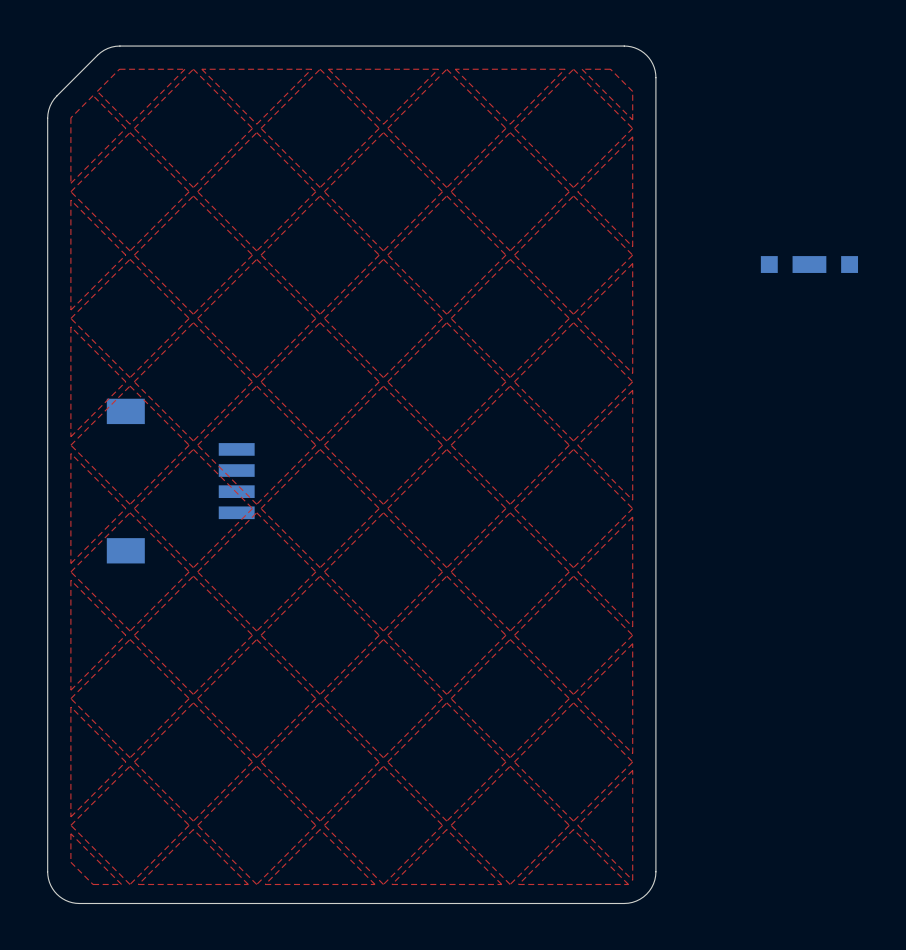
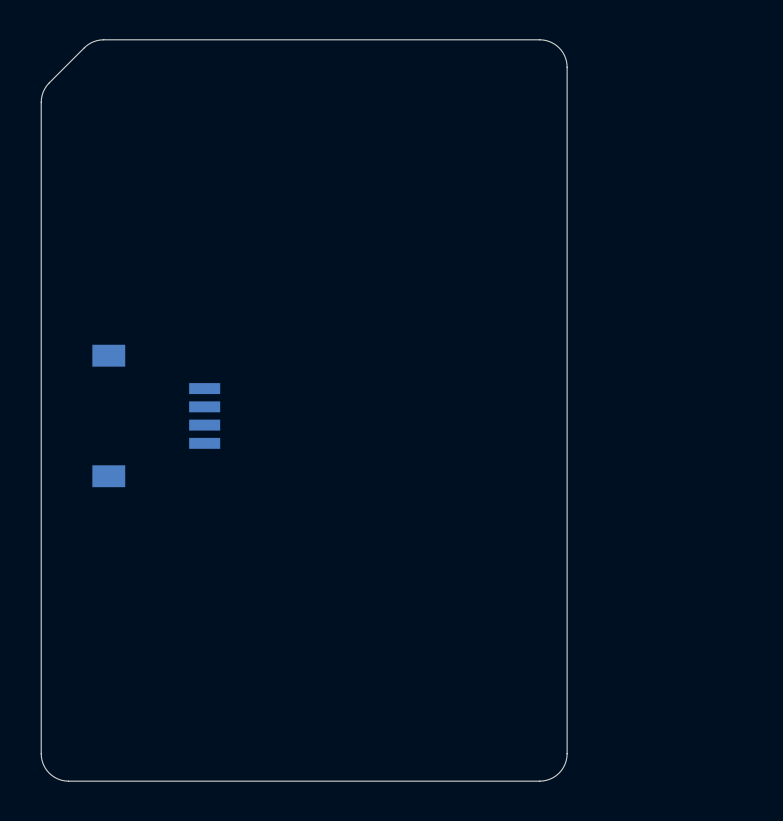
top zone outline: (119, 69) (184, 69) (130, 124) (97, 91) (119, 69) -> none
top zone outline: (193, 69) (252, 128) (193, 187) (134, 128) (193, 69) -> none
top zone outline: (201, 69) (256, 124) (311, 69) (201, 69) -> none
top zone outline: (320, 69) (260, 128) (320, 187) (379, 128) (320, 69) -> none
top zone outline: (328, 69) (383, 124) (438, 69) (328, 69) -> none
top zone outline: (446, 69) (387, 128) (446, 187) (505, 128) (446, 69) -> none
top zone outline: (455, 69) (510, 124) (565, 69) (455, 69) -> none
top zone outline: (573, 69) (514, 128) (573, 187) (632, 128) (573, 69) -> none
top zone outline: (582, 69) (610, 69) (632, 91) (632, 119) (582, 69) -> none
top zone outline: (93, 95) (125, 128) (70, 183) (70, 117) (93, 95) -> none
top zone outline: (130, 132) (70, 191) (130, 250) (189, 191) (130, 132) -> none
top zone outline: (256, 132) (315, 191) (256, 250) (197, 191) (256, 132) -> none
top zone outline: (383, 132) (324, 191) (383, 250) (442, 191) (383, 132) -> none
top zone outline: (510, 132) (451, 191) (510, 250) (569, 191) (510, 132) -> none
top zone outline: (632, 136) (577, 191) (632, 246) (632, 136) -> none
top zone outline: (193, 195) (134, 255) (193, 314) (252, 255) (193, 195) -> none
top zone outline: (320, 195) (379, 255) (320, 314) (260, 255) (320, 195) -> none
top zone outline: (446, 195) (387, 255) (446, 314) (505, 255) (446, 195) -> none
top zone outline: (573, 195) (514, 255) (573, 314) (632, 255) (573, 195) -> none
top zone outline: (70, 200) (125, 255) (70, 310) (70, 200) -> none
top zone outline: (130, 259) (189, 318) (130, 377) (70, 318) (130, 259) -> none
top zone outline: (256, 259) (197, 318) (256, 377) (315, 318) (256, 259) -> none
top zone outline: (383, 259) (442, 318) (383, 377) (324, 318) (383, 259) -> none
top zone outline: (510, 259) (451, 318) (510, 377) (569, 318) (510, 259) -> none
top zone outline: (632, 263) (577, 318) (632, 373) (632, 263) -> none
part: (785, 264) -> none
part: (833, 264) -> none
top zone outline: (193, 322) (252, 381) (193, 440) (134, 381) (193, 322) -> none
top zone outline: (320, 322) (260, 381) (320, 440) (379, 381) (320, 322) -> none
top zone outline: (446, 322) (505, 381) (446, 440) (387, 381) (446, 322) -> none
top zone outline: (573, 322) (514, 381) (573, 440) (632, 381) (573, 322) -> none
top zone outline: (70, 326) (125, 381) (70, 436) (70, 326) -> none
top zone outline: (130, 386) (189, 445) (130, 504) (70, 445) (130, 386) -> none
top zone outline: (256, 386) (315, 445) (256, 504) (197, 445) (256, 386) -> none
top zone outline: (383, 386) (442, 445) (383, 504) (324, 445) (383, 386) -> none
top zone outline: (510, 386) (569, 445) (510, 504) (451, 445) (510, 386) -> none
top zone outline: (632, 390) (577, 445) (632, 500) (632, 390) -> none
top zone outline: (193, 449) (252, 508) (193, 567) (134, 508) (193, 449) -> none
top zone outline: (320, 449) (379, 508) (320, 567) (260, 508) (320, 449) -> none
top zone outline: (446, 449) (505, 508) (446, 567) (387, 508) (446, 449) -> none
top zone outline: (573, 449) (632, 508) (573, 567) (514, 508) (573, 449) -> none
top zone outline: (70, 453) (125, 508) (70, 563) (70, 453) -> none
top zone outline: (130, 512) (189, 571) (130, 631) (70, 571) (130, 512) -> none
top zone outline: (256, 512) (315, 571) (256, 631) (197, 571) (256, 512) -> none
top zone outline: (383, 512) (442, 571) (383, 631) (324, 571) (383, 512) -> none
top zone outline: (510, 512) (451, 571) (510, 631) (569, 571) (510, 512) -> none
top zone outline: (632, 517) (577, 571) (632, 626) (632, 517) -> none
top zone outline: (193, 576) (252, 635) (193, 694) (134, 635) (193, 576) -> none
top zone outline: (320, 576) (379, 635) (320, 694) (260, 635) (320, 576) -> none
top zone outline: (446, 576) (387, 635) (446, 694) (505, 635) (446, 576) -> none
top zone outline: (573, 576) (632, 635) (573, 694) (514, 635) (573, 576) -> none
top zone outline: (70, 580) (125, 635) (70, 690) (70, 580) -> none
top zone outline: (130, 639) (189, 698) (130, 757) (70, 698) (130, 639) -> none
top zone outline: (256, 639) (315, 698) (256, 757) (197, 698) (256, 639) -> none
top zone outline: (383, 639) (324, 698) (383, 757) (442, 698) (383, 639) -> none
top zone outline: (510, 639) (569, 698) (510, 757) (451, 698) (510, 639) -> none
top zone outline: (632, 643) (577, 698) (632, 753) (632, 643) -> none
top zone outline: (193, 702) (252, 761) (193, 821) (134, 761) (193, 702) -> none
top zone outline: (320, 702) (260, 761) (320, 821) (379, 761) (320, 702) -> none
top zone outline: (446, 702) (505, 761) (446, 821) (387, 761) (446, 702) -> none
top zone outline: (573, 702) (632, 761) (573, 821) (514, 761) (573, 702) -> none
top zone outline: (70, 707) (125, 761) (70, 816) (70, 707) -> none
top zone outline: (130, 766) (189, 825) (130, 884) (70, 825) (130, 766) -> none
top zone outline: (256, 766) (315, 825) (256, 884) (197, 825) (256, 766) -> none
top zone outline: (383, 766) (442, 825) (383, 884) (324, 825) (383, 766) -> none
top zone outline: (510, 766) (569, 825) (510, 884) (451, 825) (510, 766) -> none
top zone outline: (632, 770) (577, 825) (632, 880) (632, 770) -> none
top zone outline: (193, 829) (138, 884) (248, 884) (193, 829) -> none
top zone outline: (320, 829) (375, 884) (265, 884) (320, 829) -> none
top zone outline: (446, 829) (501, 884) (391, 884) (446, 829) -> none
top zone outline: (573, 829) (628, 884) (518, 884) (573, 829) -> none
top zone outline: (70, 833) (70, 862) (93, 884) (121, 884) (70, 833) -> none

